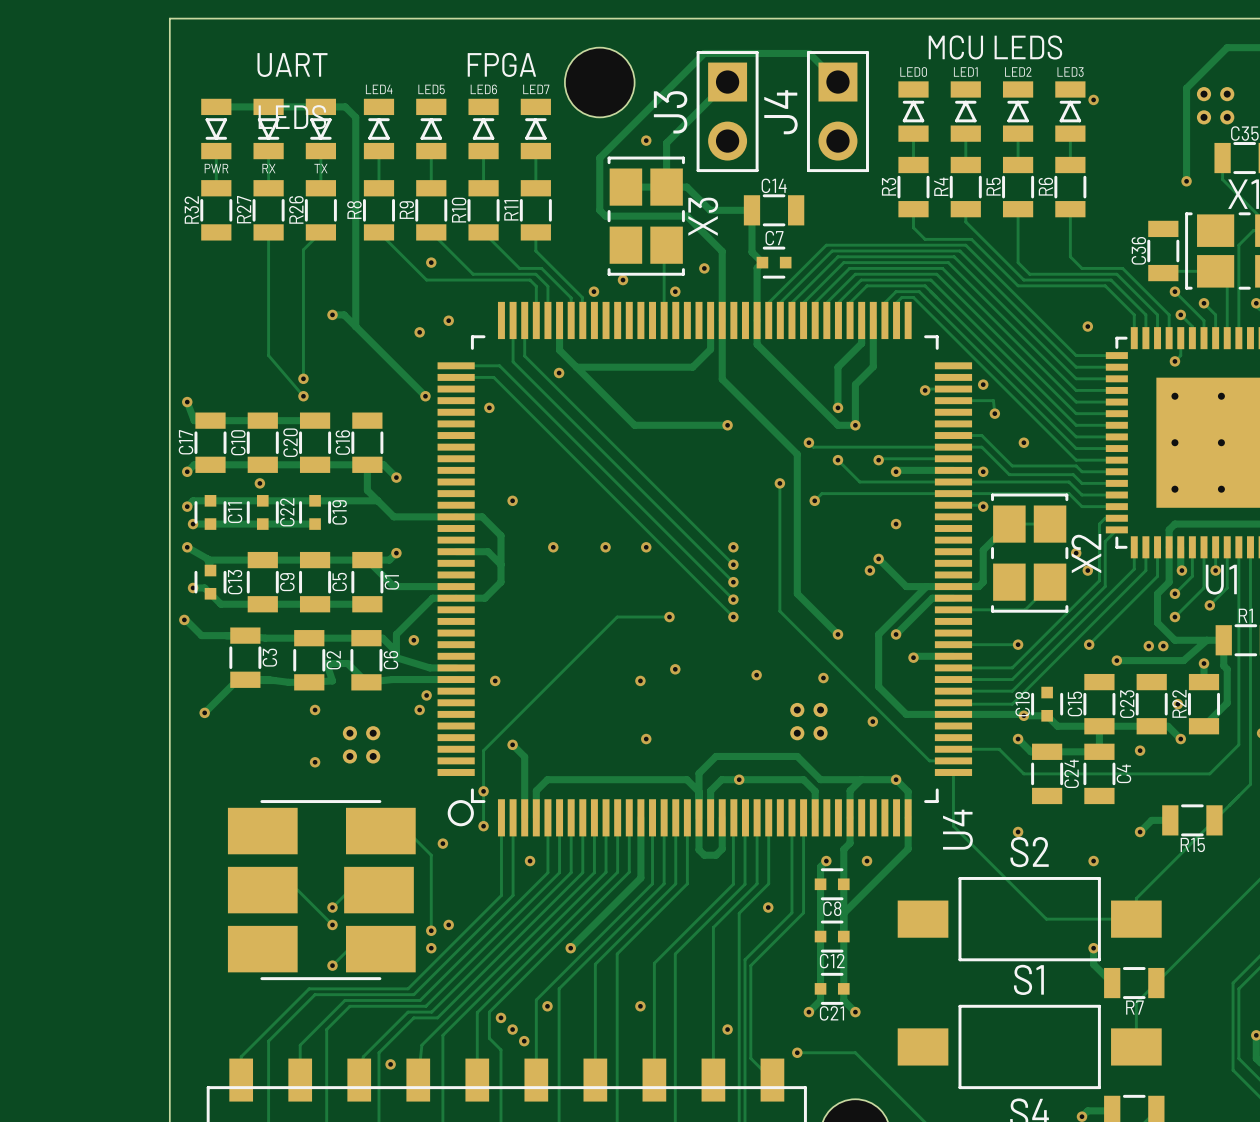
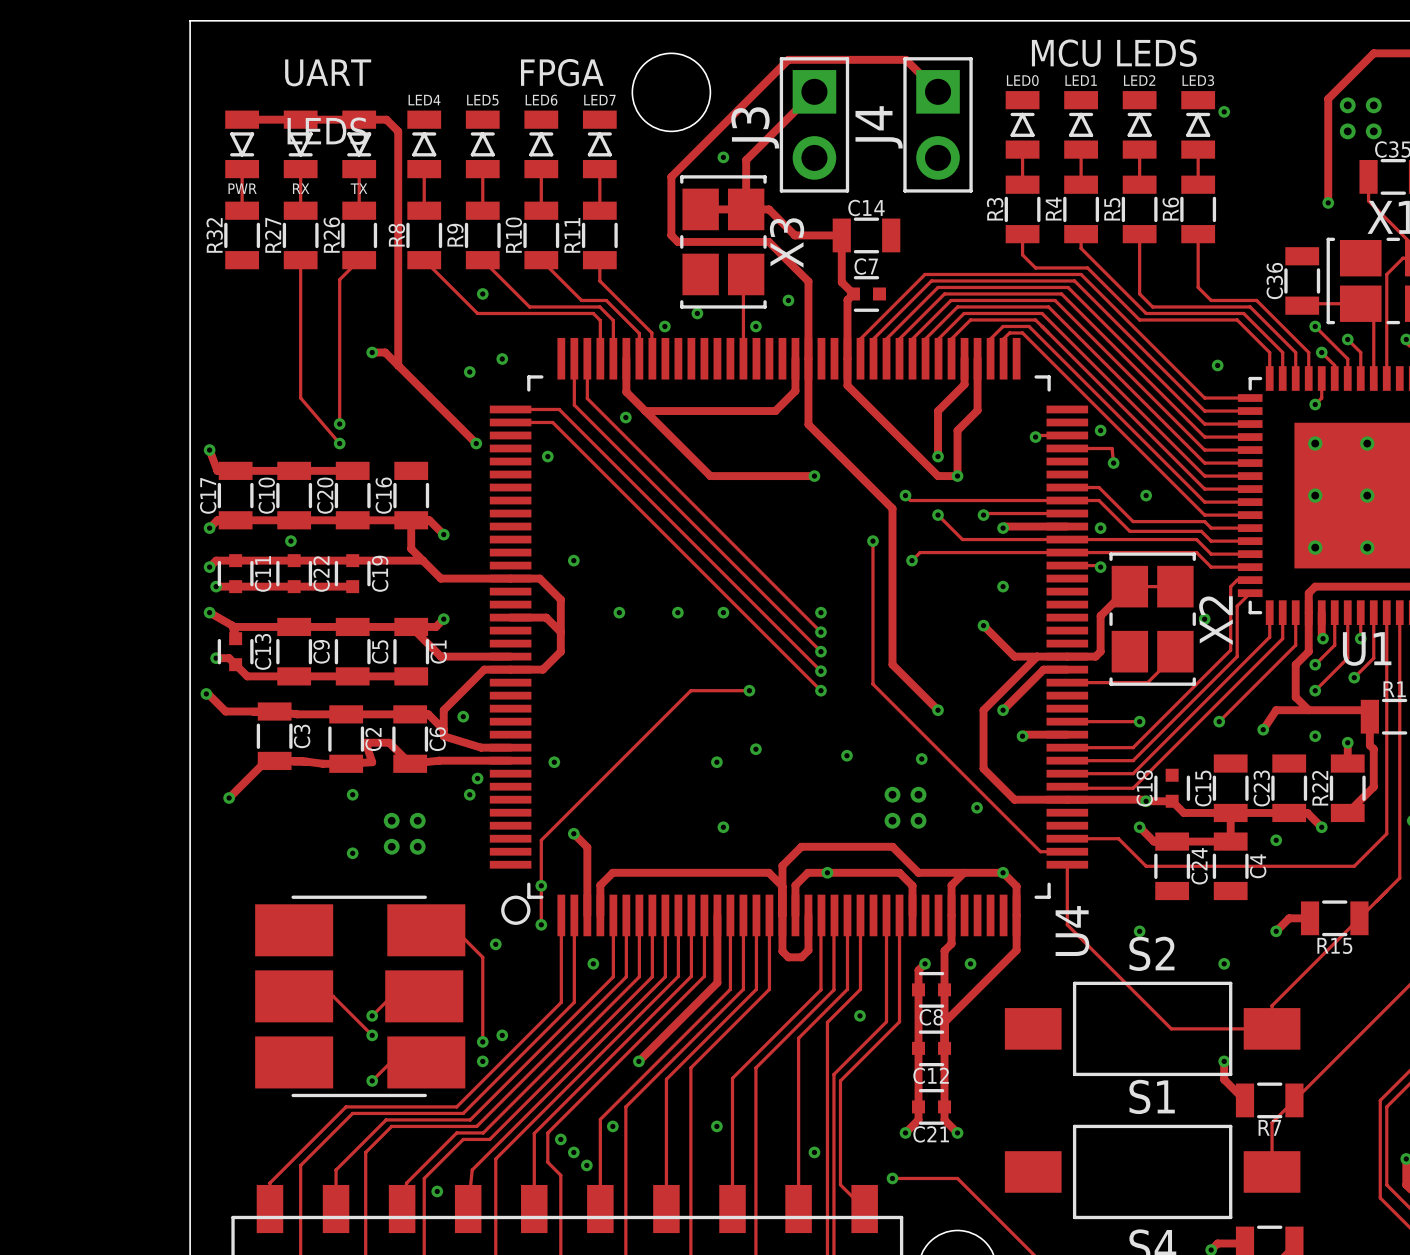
via: (869, 570) -> none
via: (1087, 570) -> none
track: (1169, 634) (1174, 640) (1223, 640) -> (1263, 729) (1276, 710) (1369, 710) (1369, 716)
track: (1206, 640) (1183, 660) (1116, 660) -> none
via: (1148, 646) -> none
via: (1163, 646) -> none
via: none -> (1263, 729)
via: none -> (1315, 736)
via: (1116, 660) -> none
via: (1177, 704) -> none

